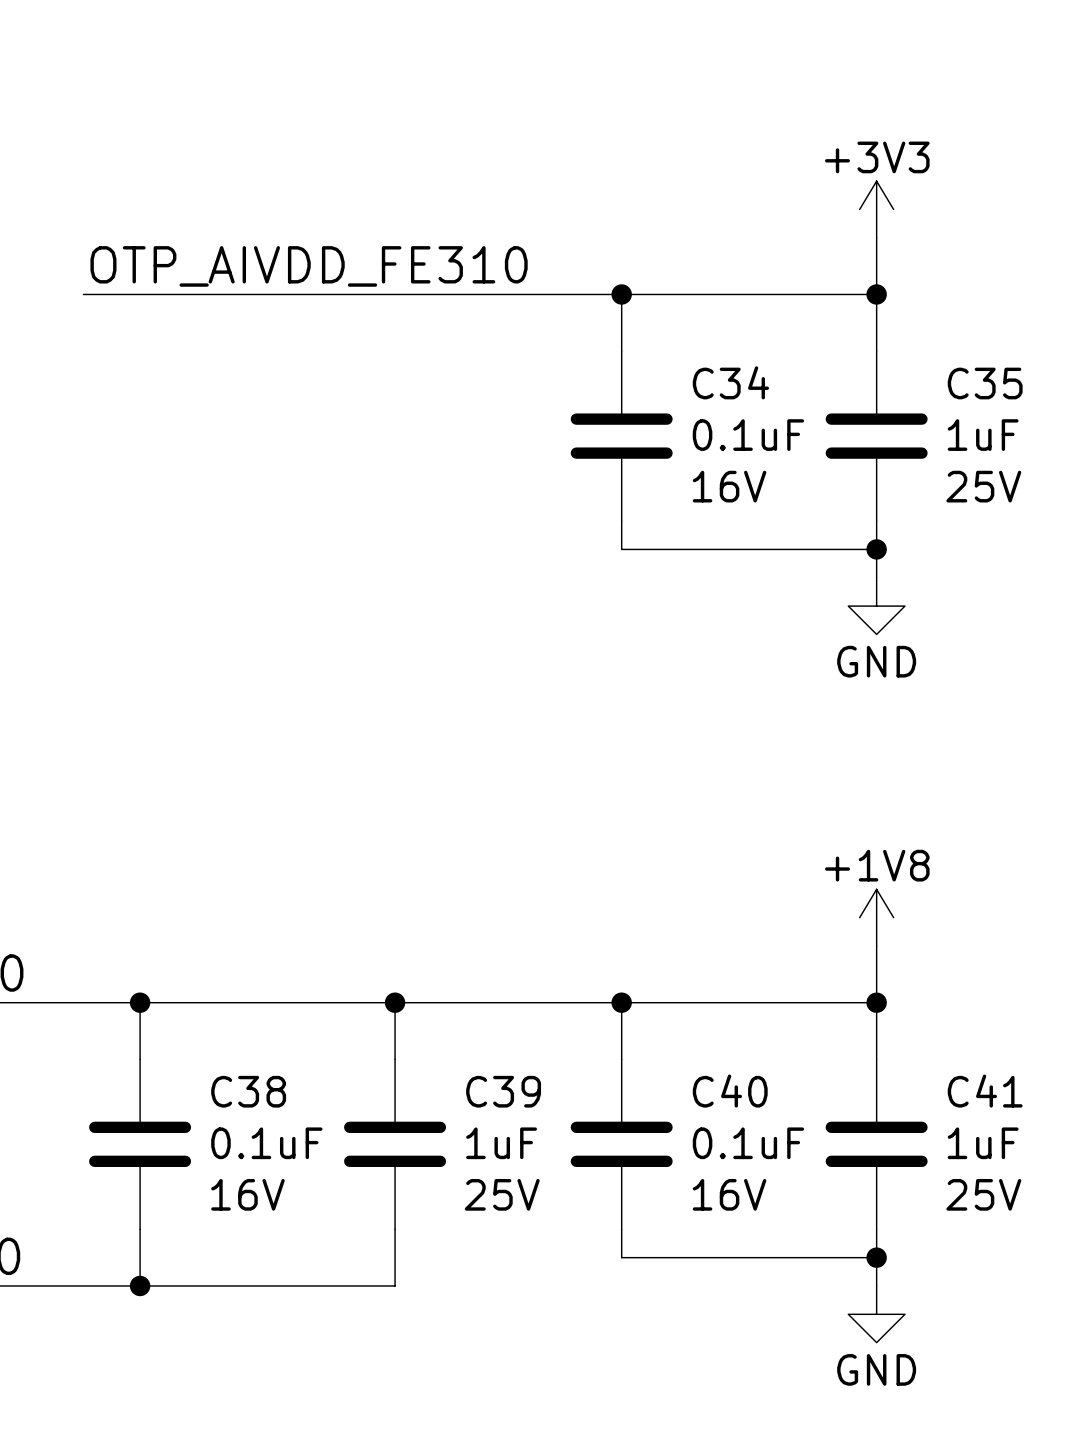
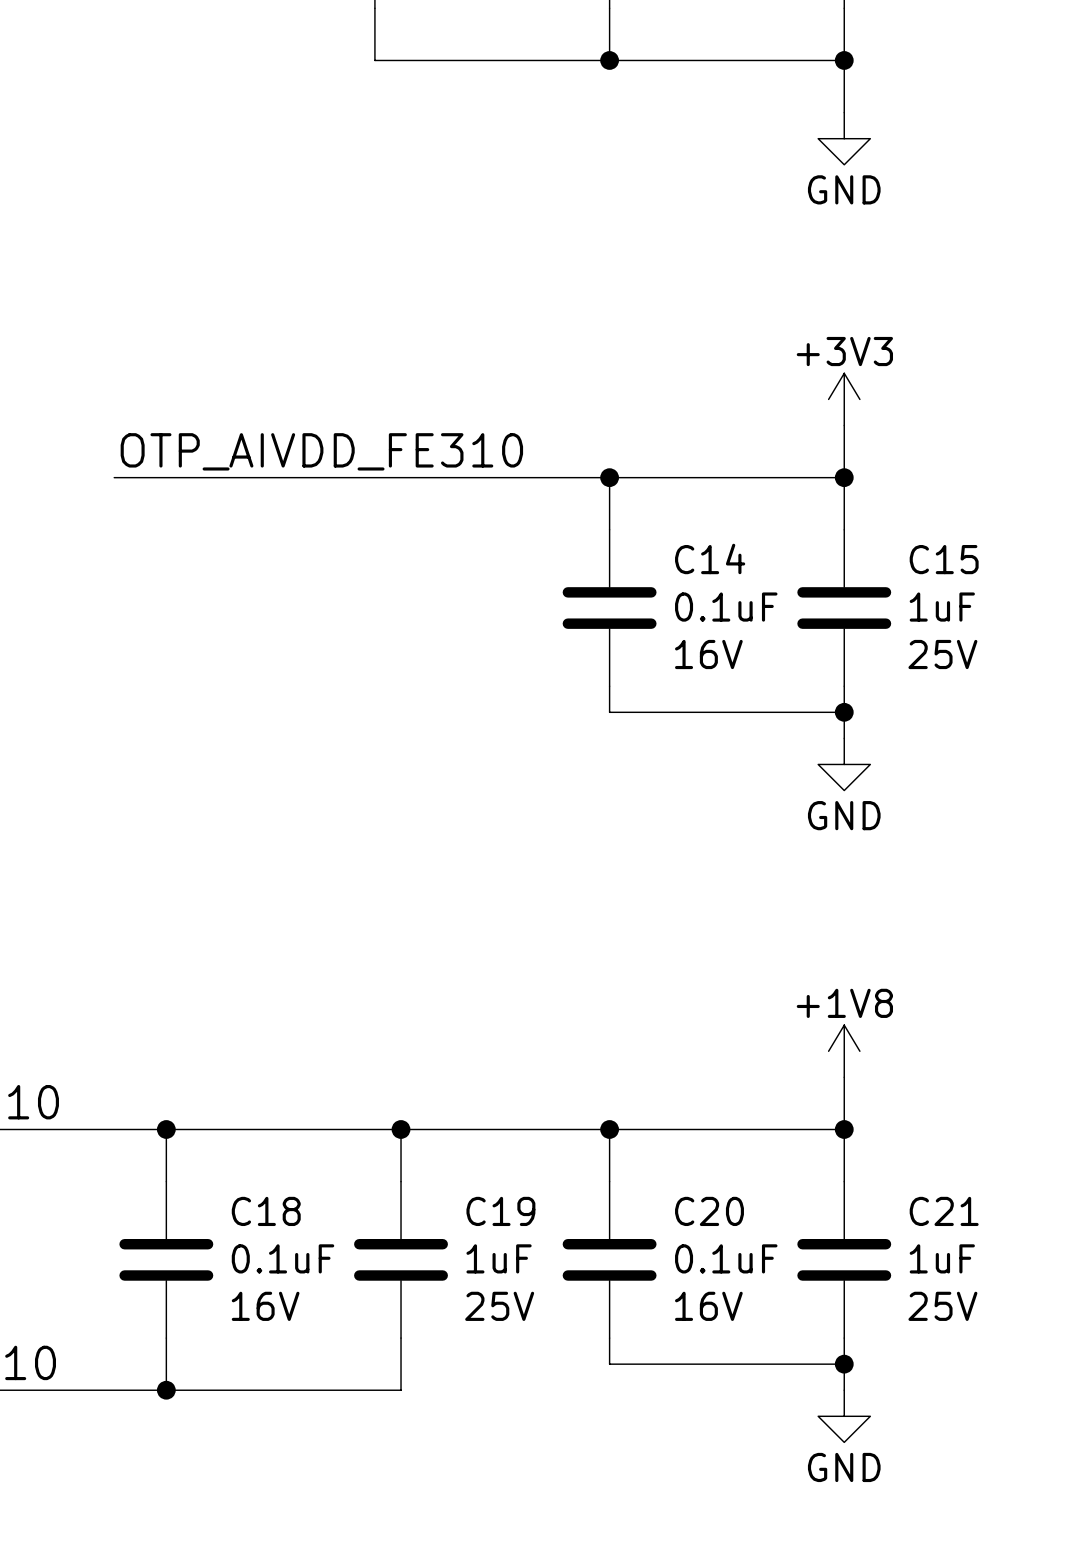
C34 name: C34 (730, 382) -> C14 (710, 558)
C35 name: C35 (985, 383) -> C15 (944, 559)
C38 name: C38 (248, 1091) -> C18 (266, 1211)
C39 name: C39 (503, 1091) -> C19 (500, 1211)
C40 name: C40 (730, 1091) -> C20 (709, 1211)
C41 name: C41 (985, 1091) -> C21 (944, 1211)

